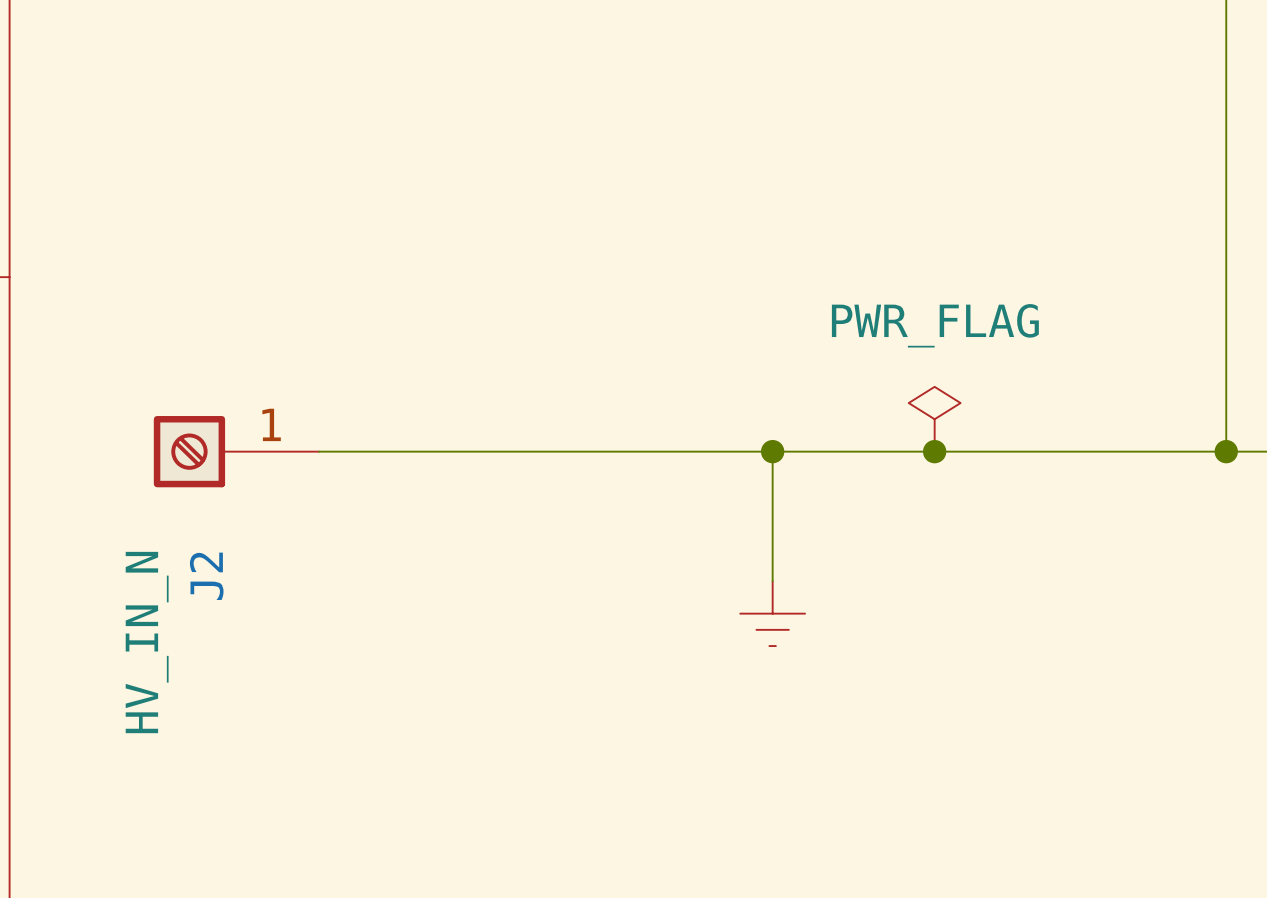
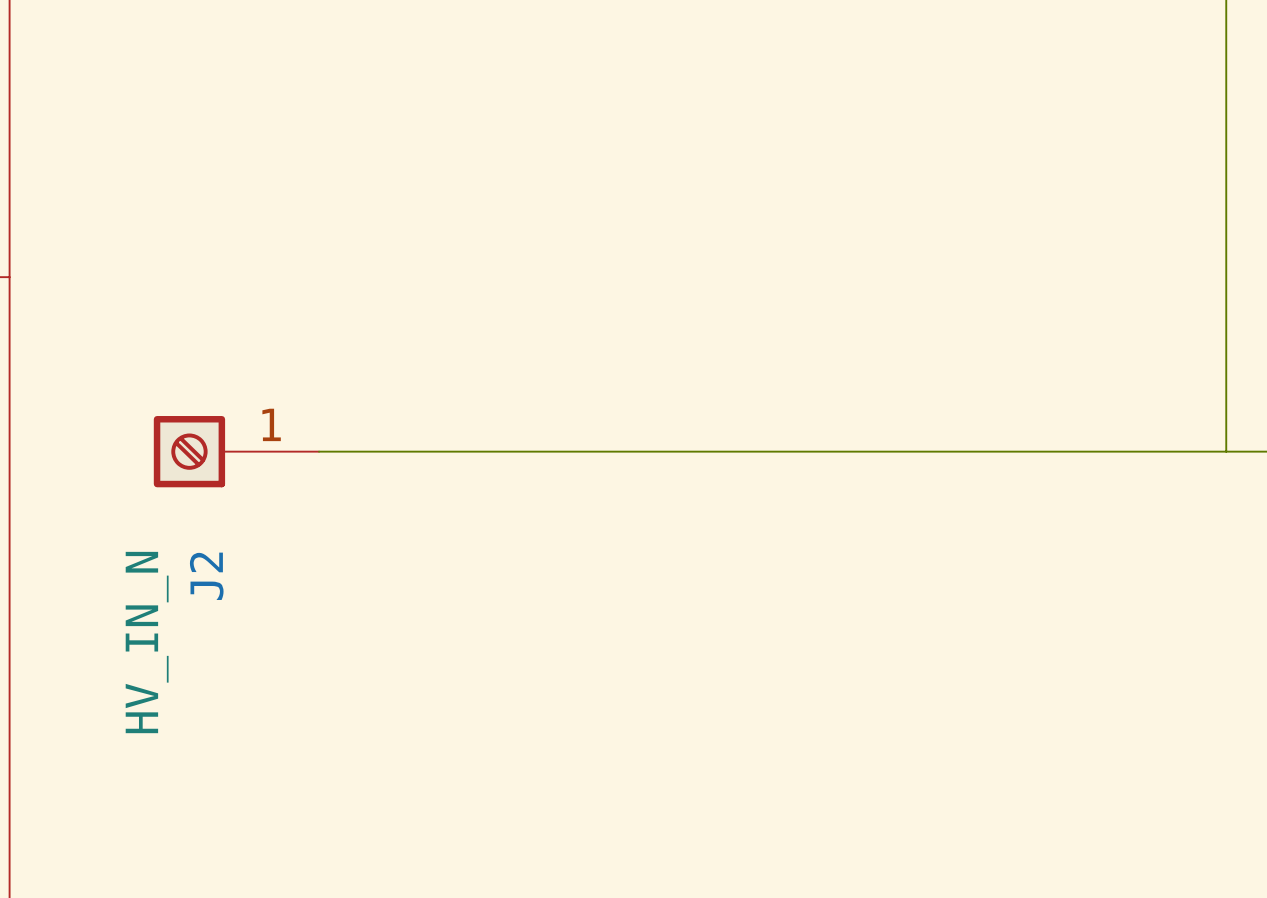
power symbol: PWR_FLAG (934, 419) -> none
wire: (772, 451) (772, 581) -> none
junction: (772, 451) -> none
junction: (934, 451) -> none
junction: (1226, 451) -> none
power symbol: (772, 613) -> none

